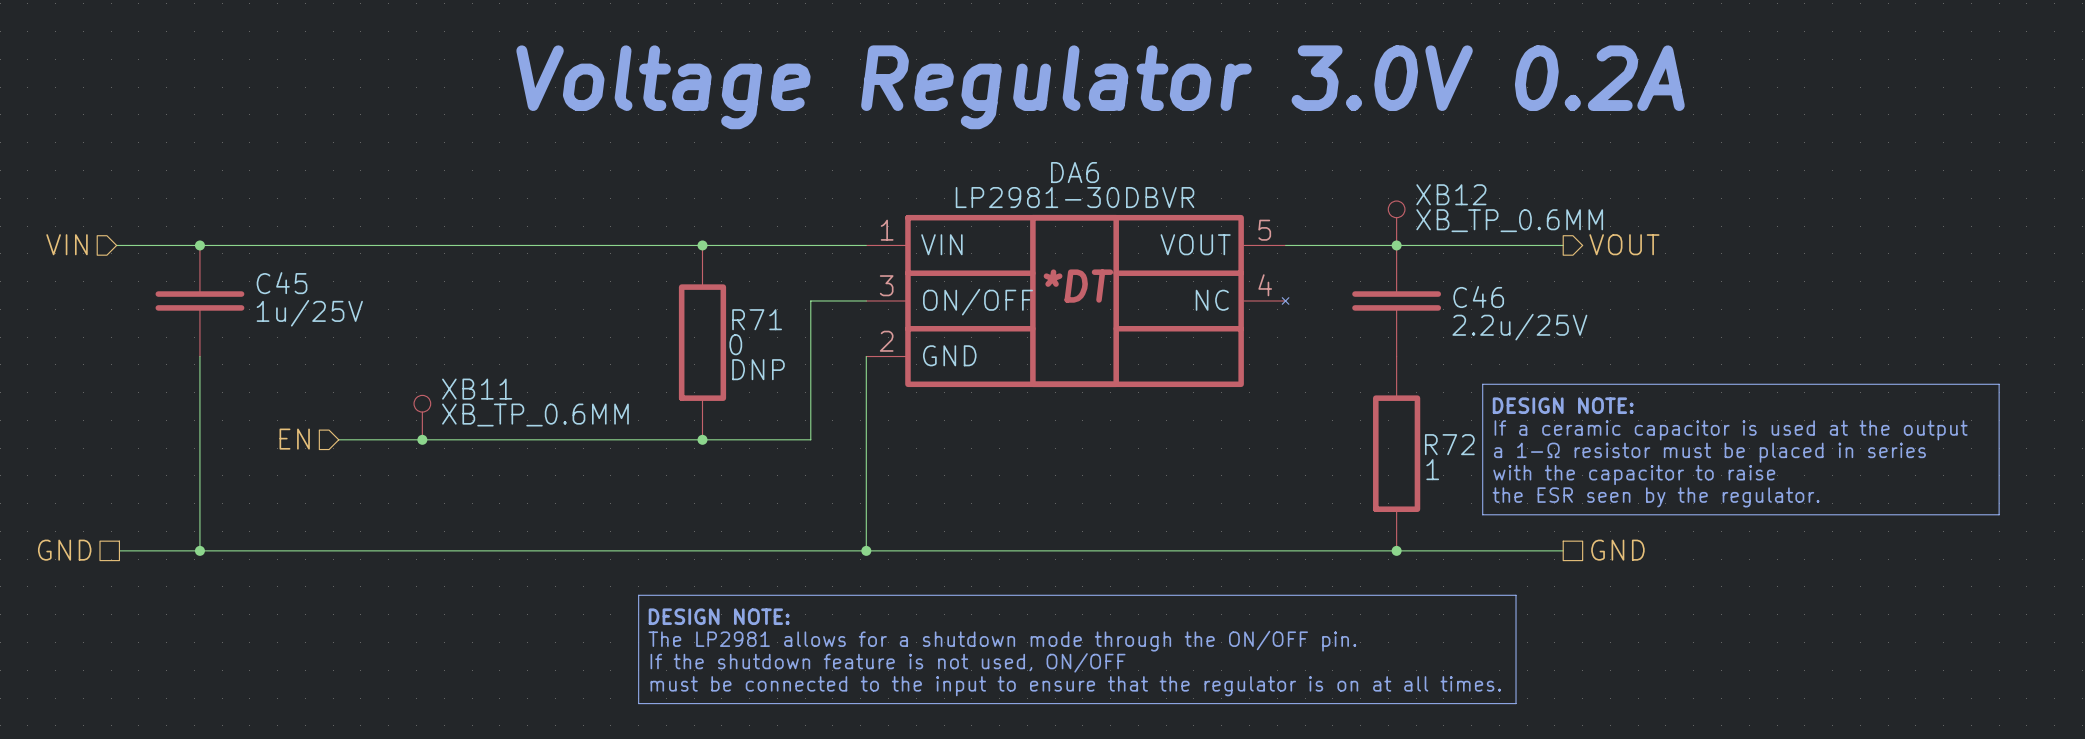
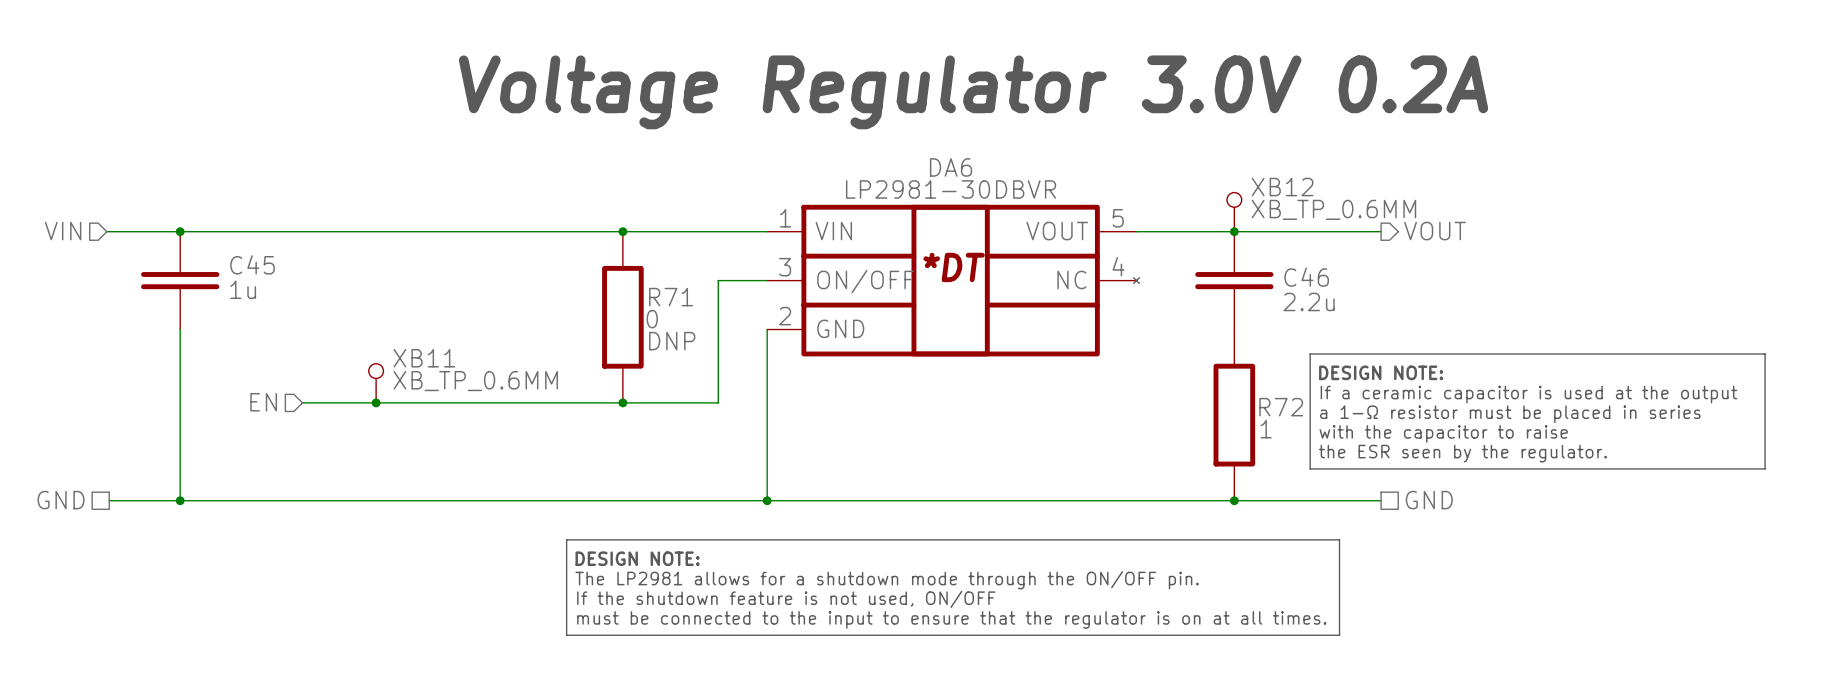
C45 value: 1u/25V (309, 313) -> 1u (243, 289)
C46 value: 2.2u/25V (1519, 327) -> 2.2u (1309, 301)

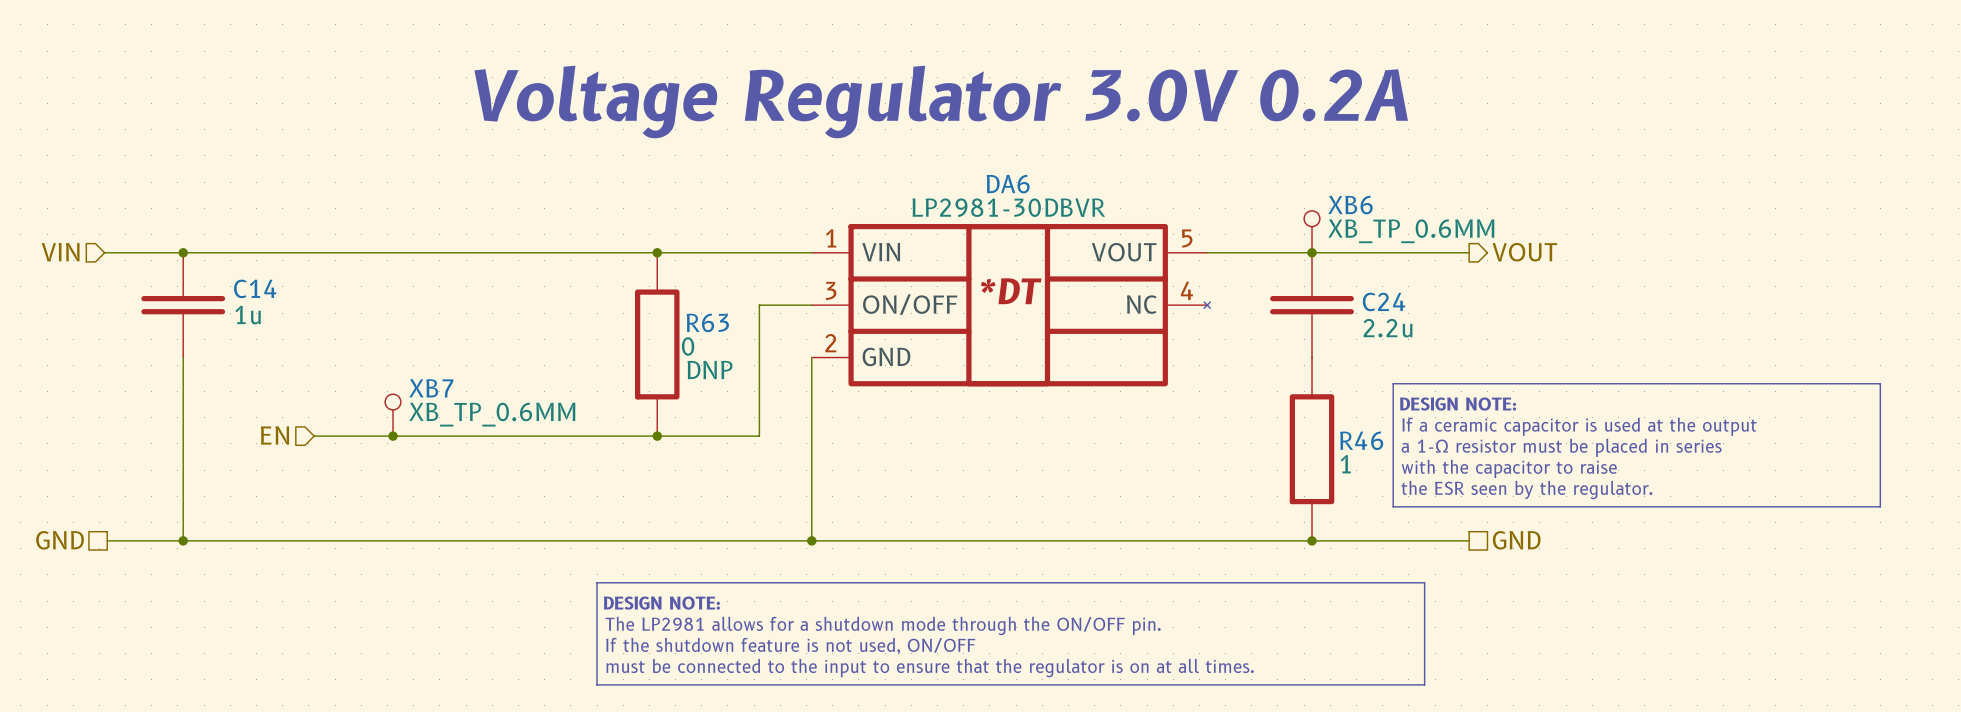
XB12 name: XB12 (1282, 187) -> XB6 (1350, 205)
C45 name: C45 (252, 264) -> C14 (255, 288)
C46 name: C46 (1306, 277) -> C24 (1384, 301)
R71 name: R71 (670, 297) -> R63 (707, 322)
XB11 name: XB11 (424, 358) -> XB7 (431, 388)
R72 name: R72 (1281, 407) -> R46 (1361, 440)

